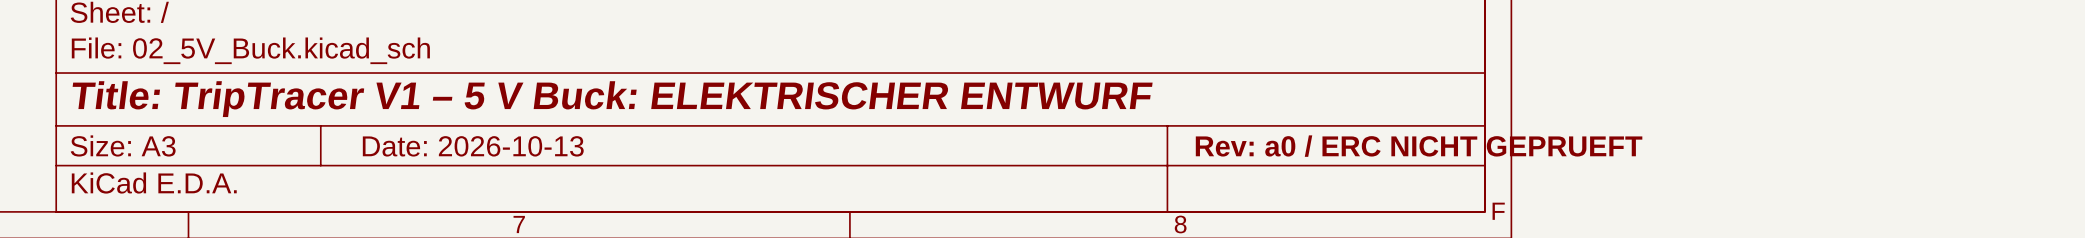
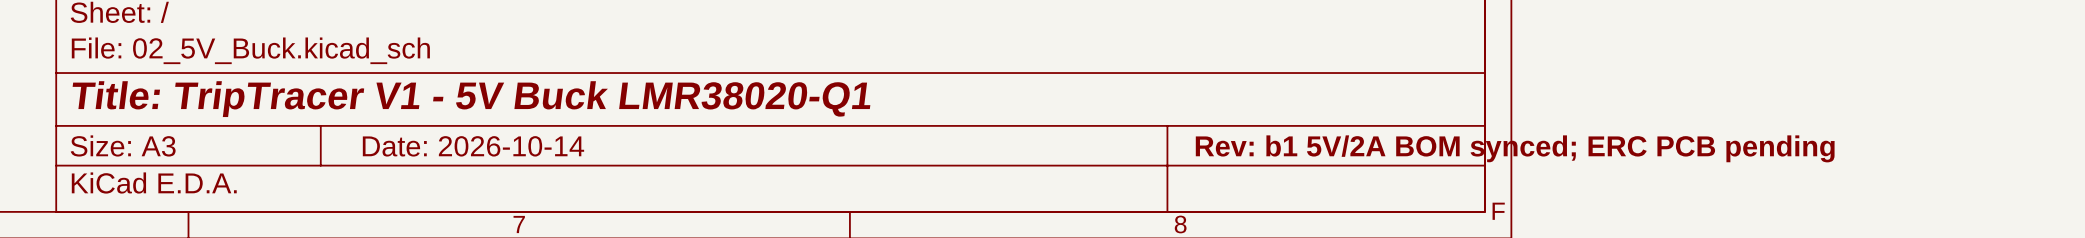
title block: Title: TripTracer V1 – 5 V Buck: ELEKTRISCHER ENTWURF (612, 99) -> Title: TripTracer V1 - 5V Buck LMR38020-Q1 (471, 99)
title block: Date: 2026-10-13 (473, 146) -> Date: 2026-10-14 (473, 146)
title block: Rev: a0 / ERC NICHT GEPRUEFT (1419, 146) -> Rev: b1 5V/2A BOM synced; ERC PCB pending (1515, 148)

